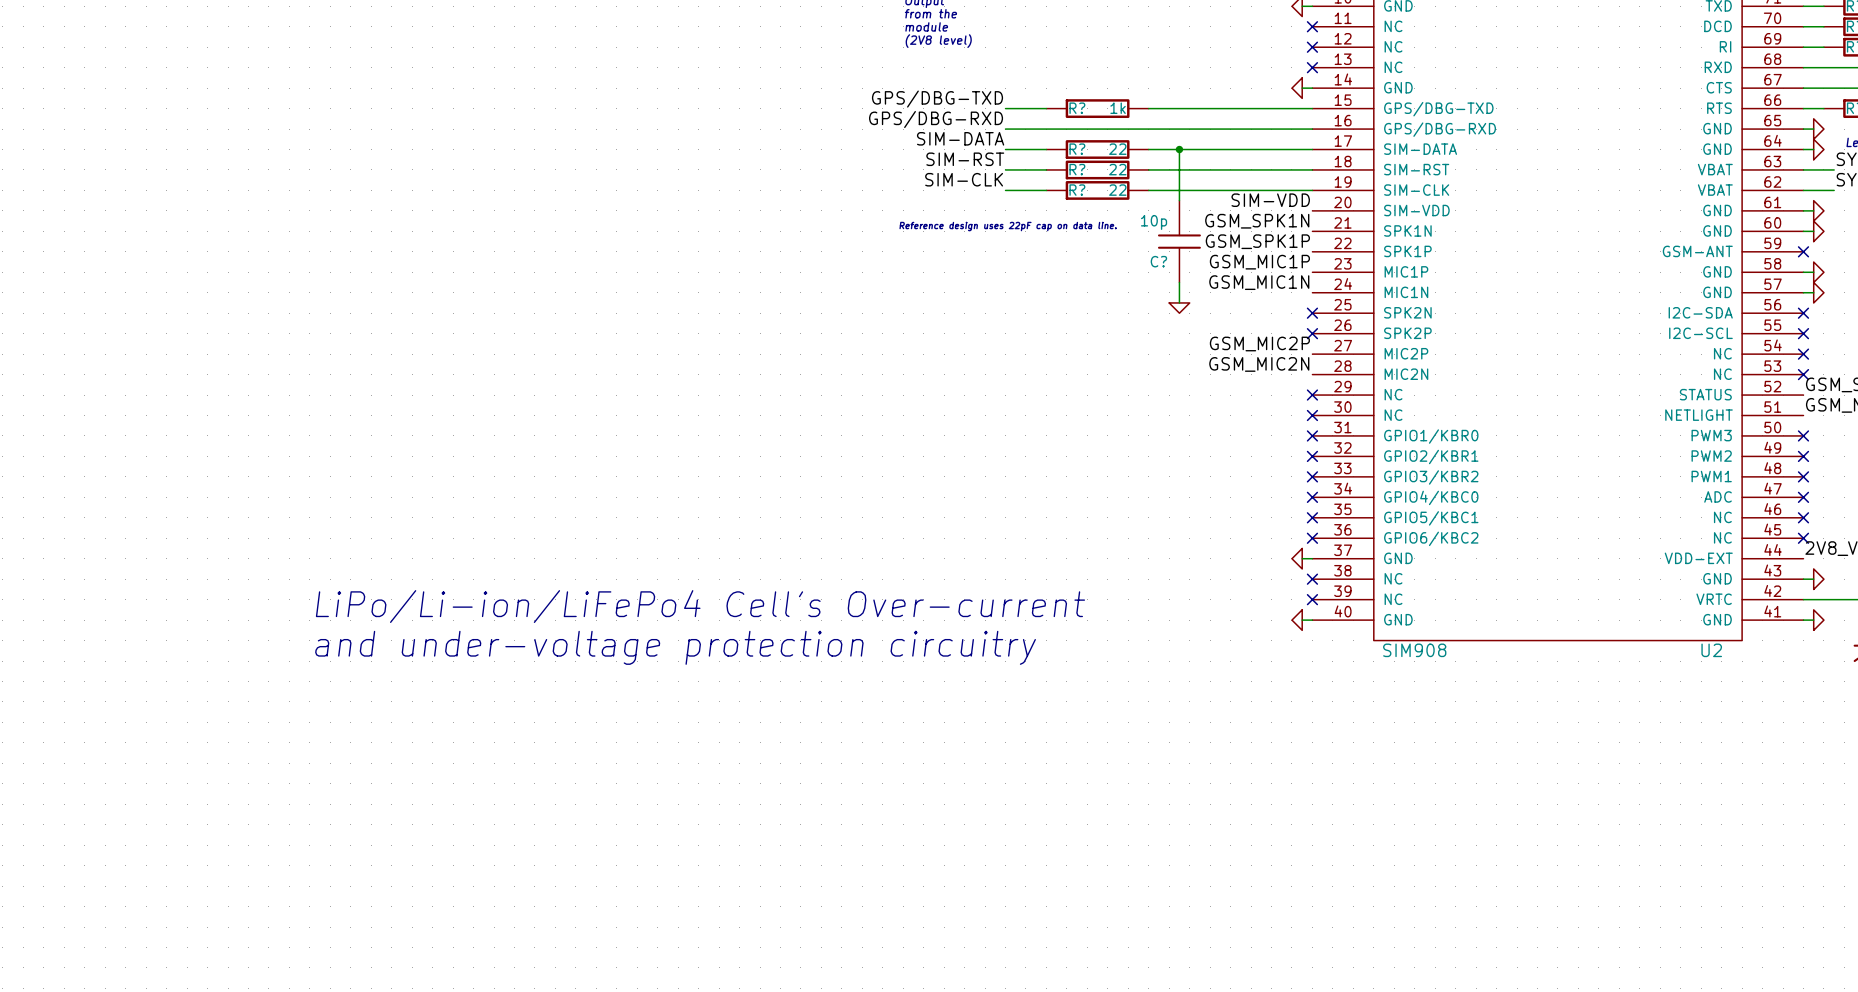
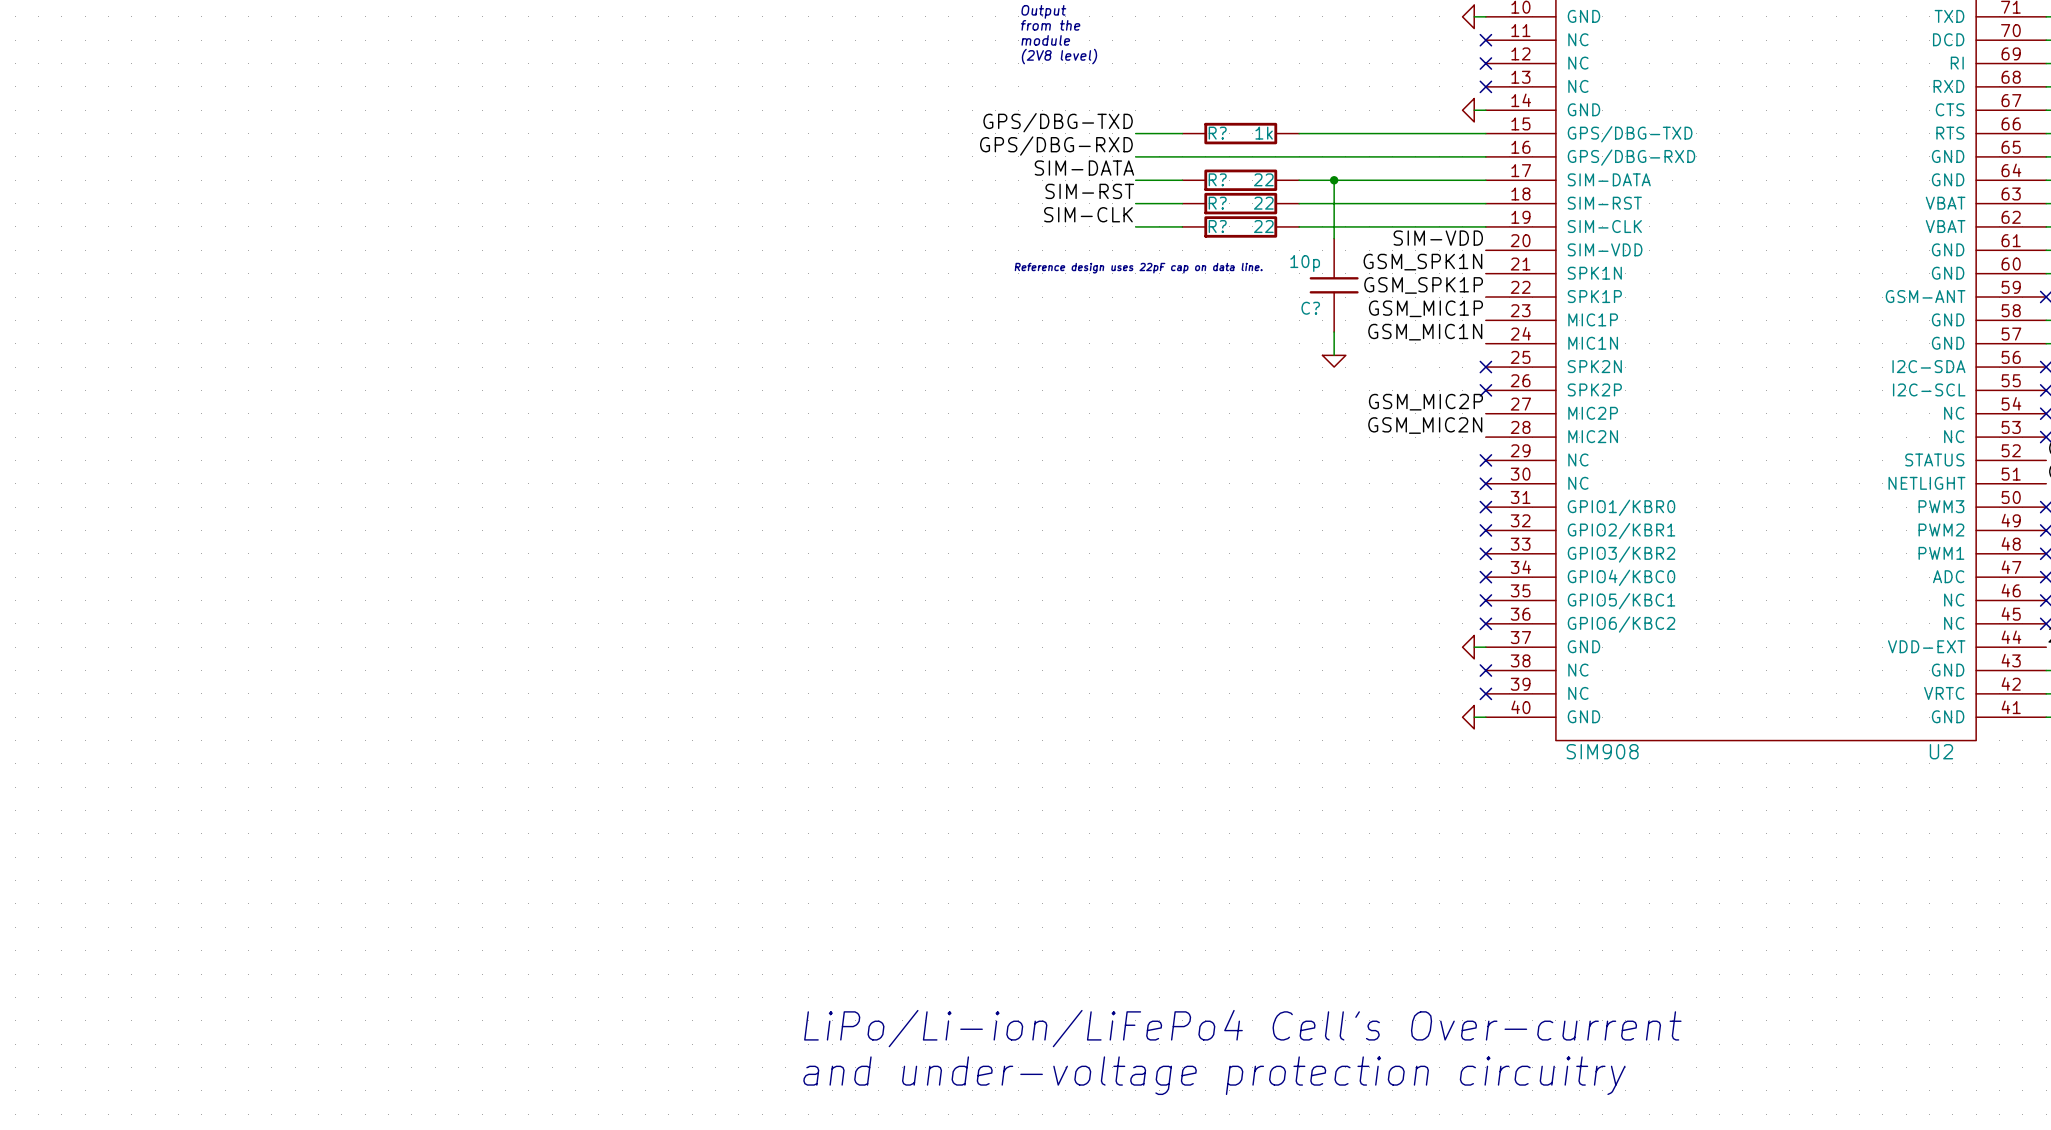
text: LiPo/Li-ion/LiFePo4 Cell's Over-current (700, 606) -> none
text: and under-voltage protection circuitry (675, 647) -> none
text: none -> LiPo/Li-ion/LiFePo4 Cell's Over-current (1242, 1028)
text: none -> and under-voltage protection circuitry (1214, 1075)

